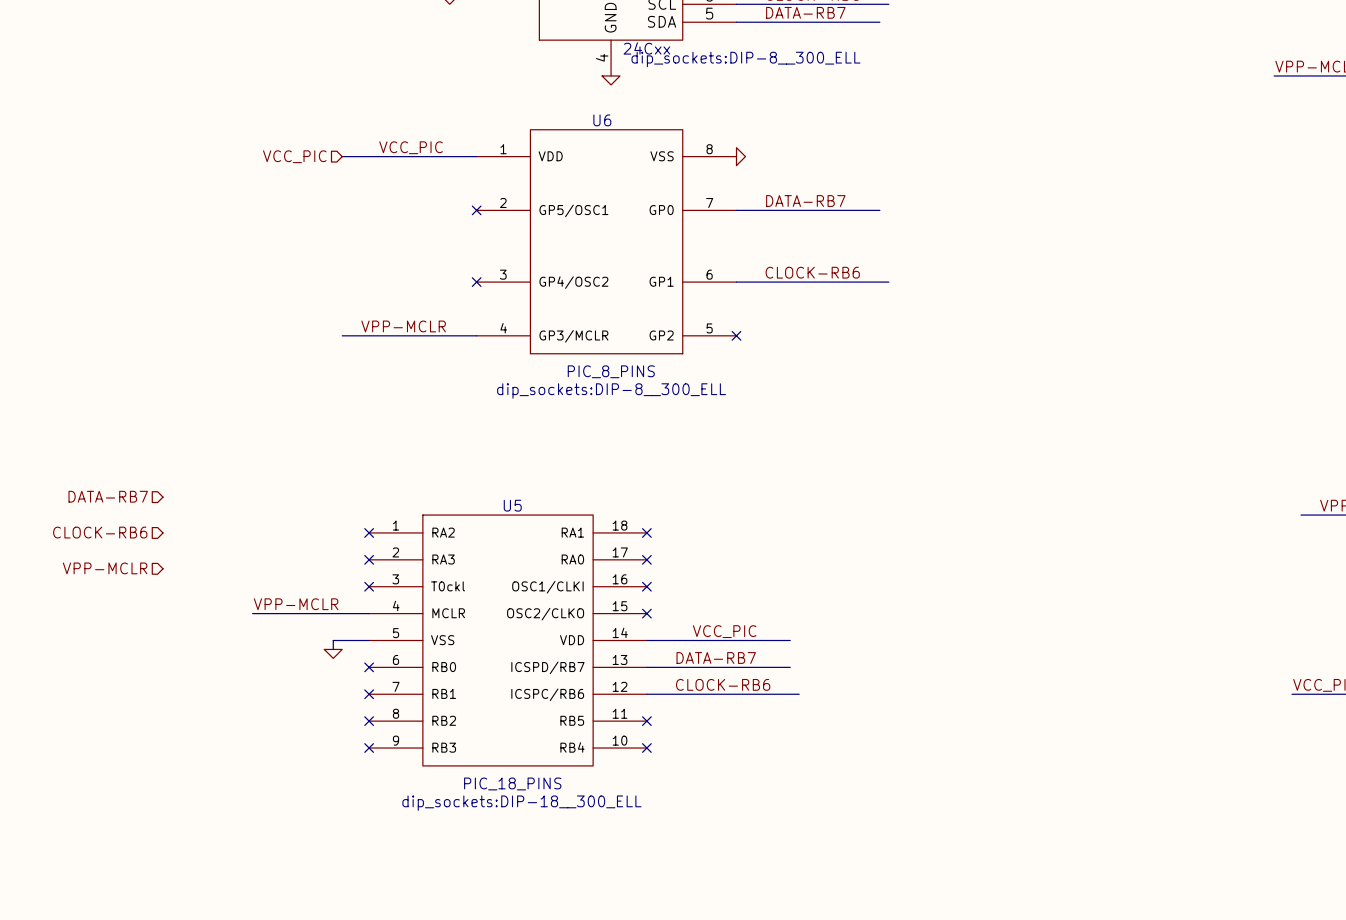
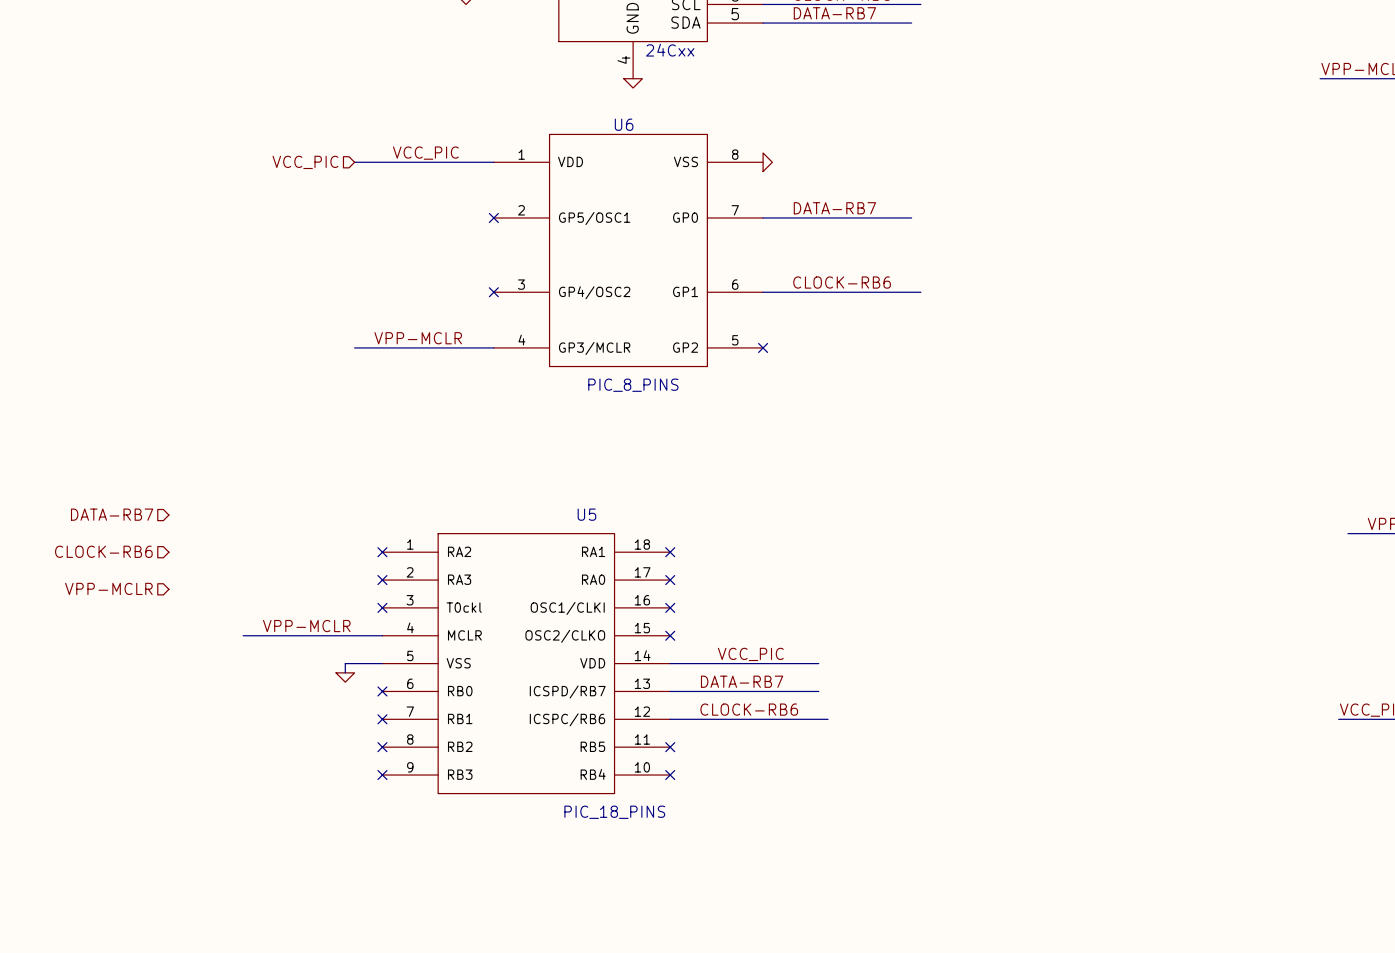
part text: dip_sockets:DIP-8__300_ELL (745, 59) -> none
U6 text: dip_sockets:DIP-8__300_ELL (611, 390) -> none
U5 name position: U5 (512, 505) -> U5 (586, 514)
wire: none -> (243, 635) (261, 635)
U5 value position: PIC_18_PINS (512, 783) -> PIC_18_PINS (614, 812)
U5 text: dip_sockets:DIP-18__300_ELL (521, 803) -> none

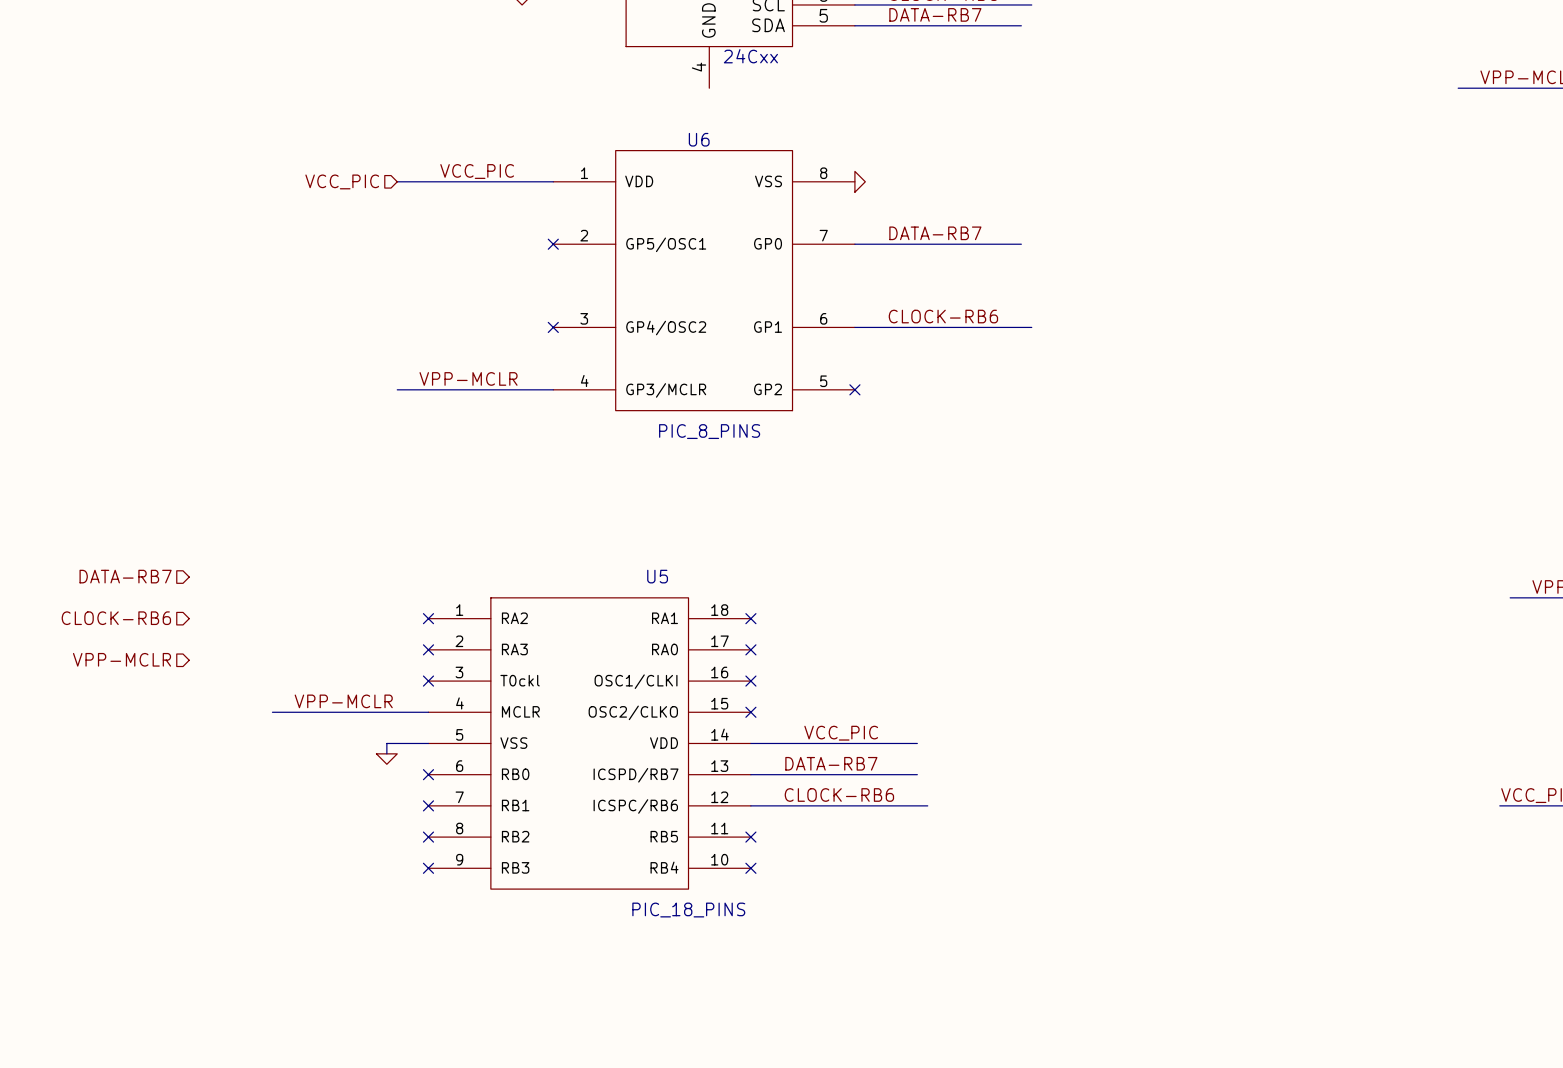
wire: none -> (1458, 88) (1478, 88)
power symbol: (633, 83) -> none

